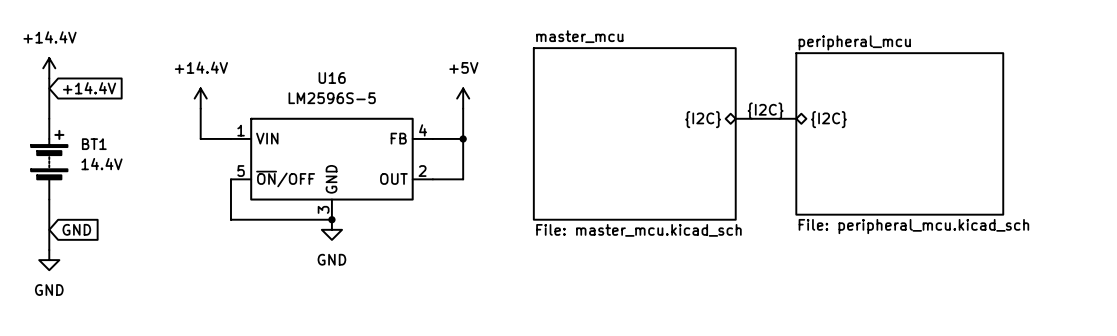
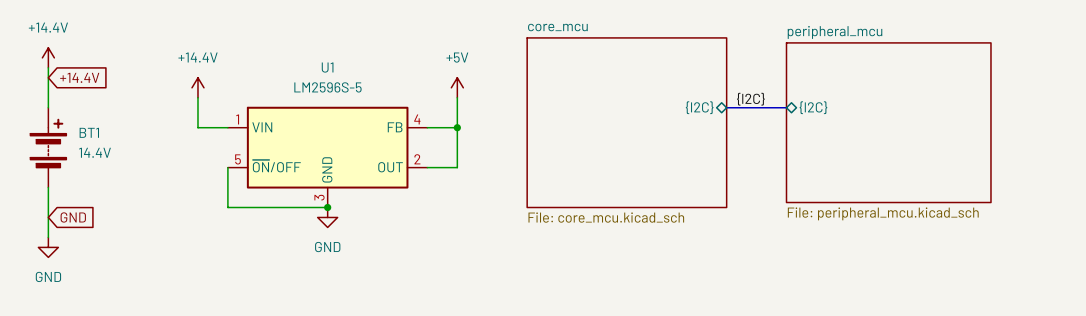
sheet master_mcu name: master_mcu (579, 36) -> core_mcu (557, 27)
U16 name: U16 (332, 78) -> U1 (327, 67)
sheet master_mcu value: File: master_mcu.kicad_sch (638, 230) -> File: core_mcu.kicad_sch (606, 217)

